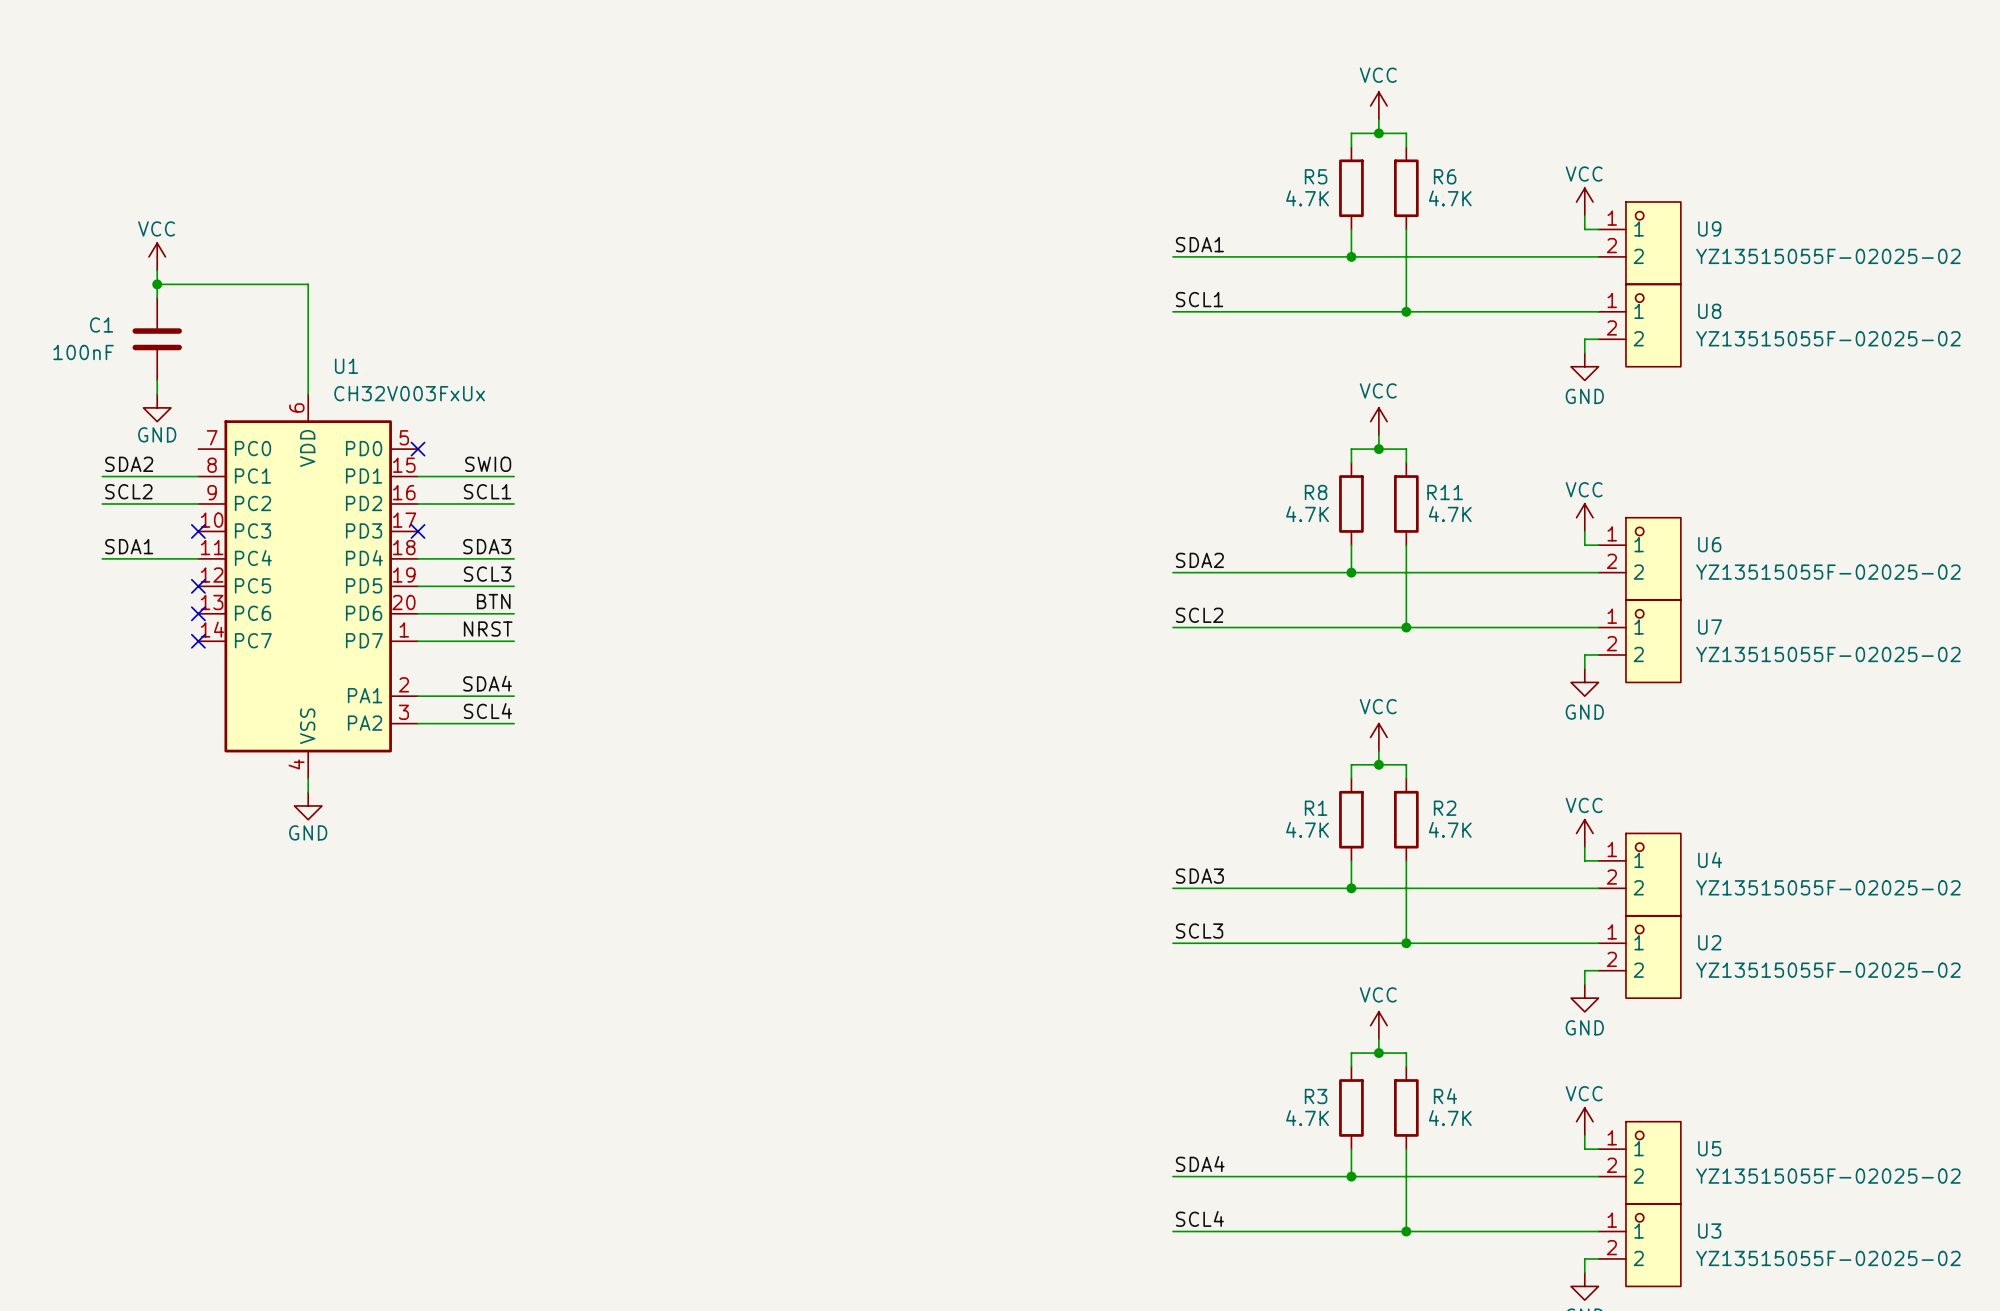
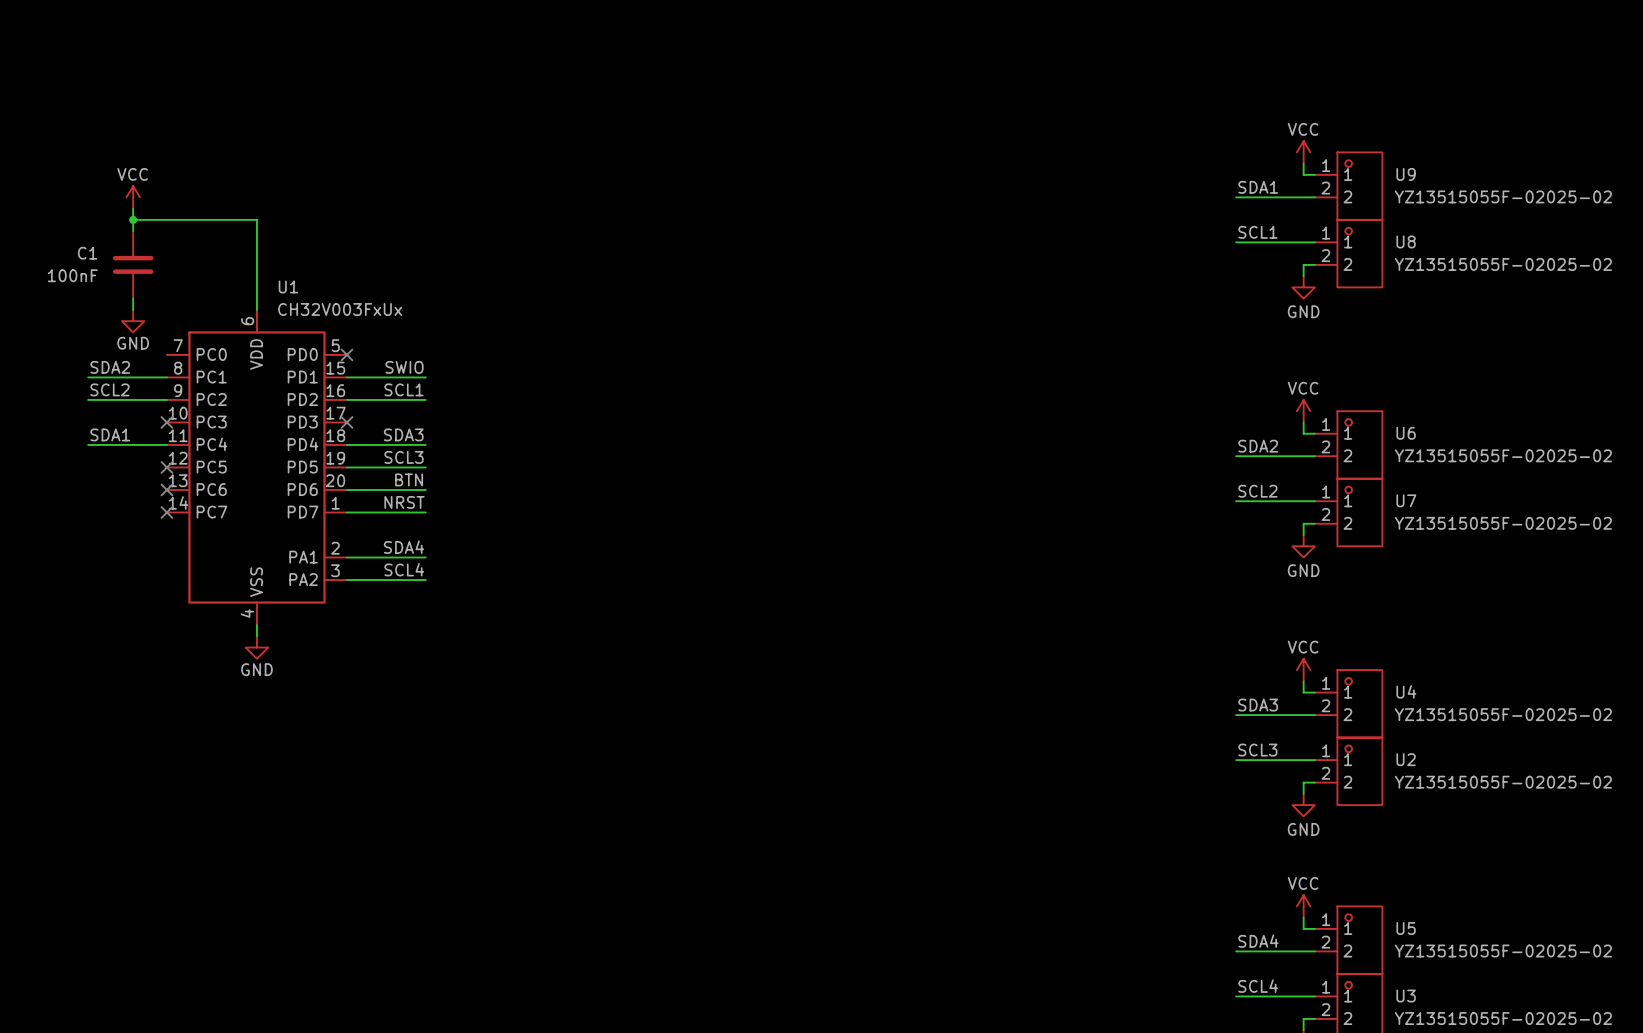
power symbol: VCC (1378, 105) -> none
wire: (1378, 119) (1378, 133) -> none
junction: (1378, 133) -> none
wire: (1351, 147) (1351, 133) (1406, 133) (1406, 147) -> none
R5: 4.7K (1351, 188) -> none
R6: 4.7K (1406, 188) -> none
wire: (1351, 229) (1351, 256) -> none
wire: (1406, 229) (1406, 311) -> none
label: SDA1 (1199, 244) -> none
label: none -> SDA1 (1258, 187)
wire: (1172, 256) (1502, 256) -> none
junction: (1351, 256) -> none
label: SCL1 (1199, 299) -> none
label: none -> SCL1 (1257, 232)
wire: (1172, 311) (1502, 311) -> none
junction: (1406, 311) -> none
power symbol: VCC (1378, 421) -> none
wire: (1378, 435) (1378, 449) -> none
junction: (1378, 449) -> none
wire: (1351, 462) (1351, 449) (1406, 449) (1406, 462) -> none
R8: 4.7K (1351, 503) -> none
R11: 4.7K (1406, 503) -> none
wire: (1351, 545) (1351, 572) -> none
wire: (1406, 545) (1406, 627) -> none
label: SDA2 (1199, 560) -> none
label: none -> SDA2 (1258, 446)
wire: (1172, 572) (1502, 572) -> none
junction: (1351, 572) -> none
label: SCL2 (1199, 615) -> none
label: none -> SCL2 (1257, 491)
wire: (1172, 627) (1502, 627) -> none
junction: (1406, 627) -> none
power symbol: VCC (1378, 737) -> none
wire: (1378, 751) (1378, 764) -> none
junction: (1378, 764) -> none
wire: (1351, 778) (1351, 764) (1406, 764) (1406, 778) -> none
R1: 4.7K (1351, 819) -> none
R2: 4.7K (1406, 819) -> none
wire: (1351, 860) (1351, 888) -> none
wire: (1406, 860) (1406, 943) -> none
label: SDA3 (1199, 876) -> none
label: none -> SDA3 (1258, 705)
wire: (1172, 888) (1502, 888) -> none
junction: (1351, 888) -> none
label: SCL3 (1199, 931) -> none
label: none -> SCL3 (1257, 750)
wire: (1172, 943) (1502, 943) -> none
junction: (1406, 943) -> none
power symbol: VCC (1378, 1025) -> none
wire: (1378, 1039) (1378, 1053) -> none
junction: (1378, 1053) -> none
wire: (1351, 1066) (1351, 1053) (1406, 1053) (1406, 1066) -> none
R3: 4.7K (1351, 1107) -> none
R4: 4.7K (1406, 1107) -> none
wire: (1351, 1149) (1351, 1176) -> none
wire: (1406, 1149) (1406, 1231) -> none
label: SDA4 (1200, 1164) -> none
label: none -> SDA4 (1258, 941)
wire: (1172, 1176) (1502, 1176) -> none
junction: (1351, 1176) -> none
label: SCL4 (1199, 1218) -> none
label: none -> SCL4 (1258, 986)
wire: (1172, 1231) (1502, 1231) -> none
junction: (1406, 1231) -> none

